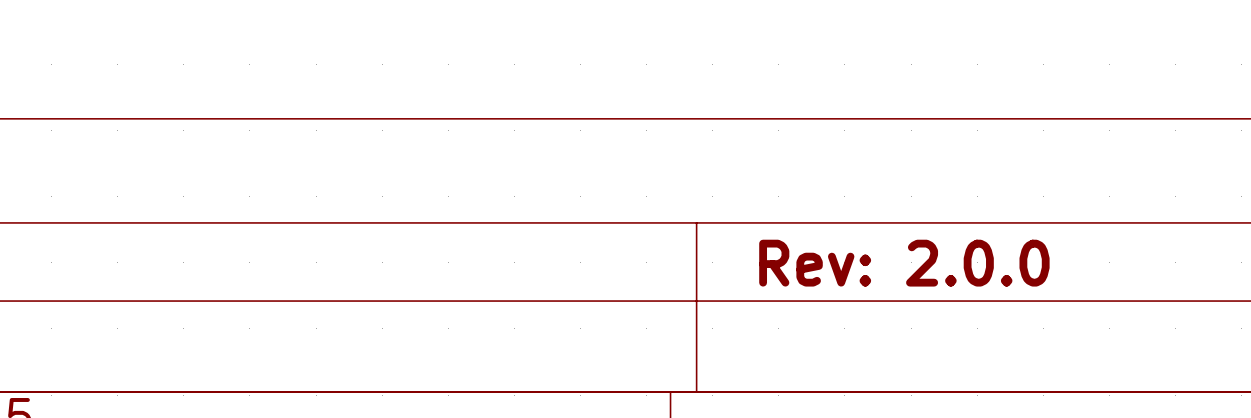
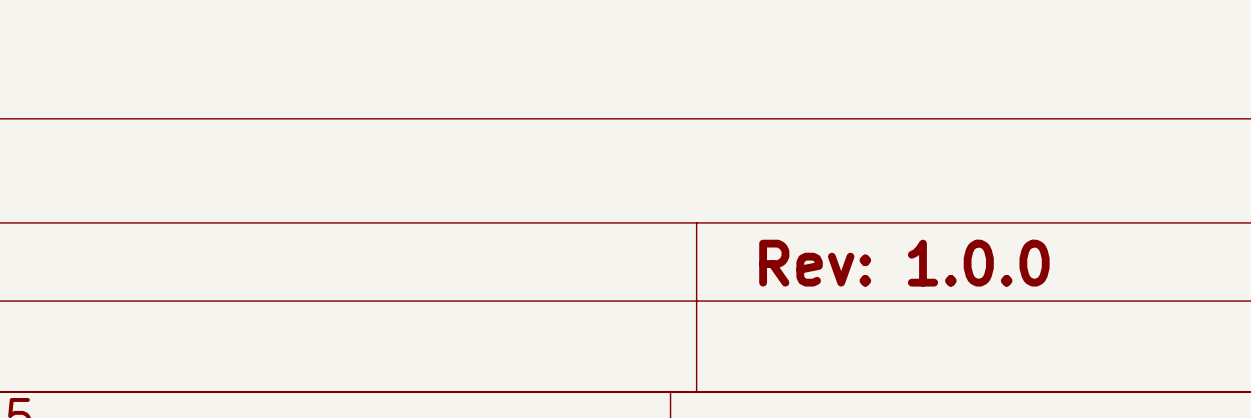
title block: Rev: 2.0.0 (904, 263) -> Rev: 1.0.0 (904, 263)

